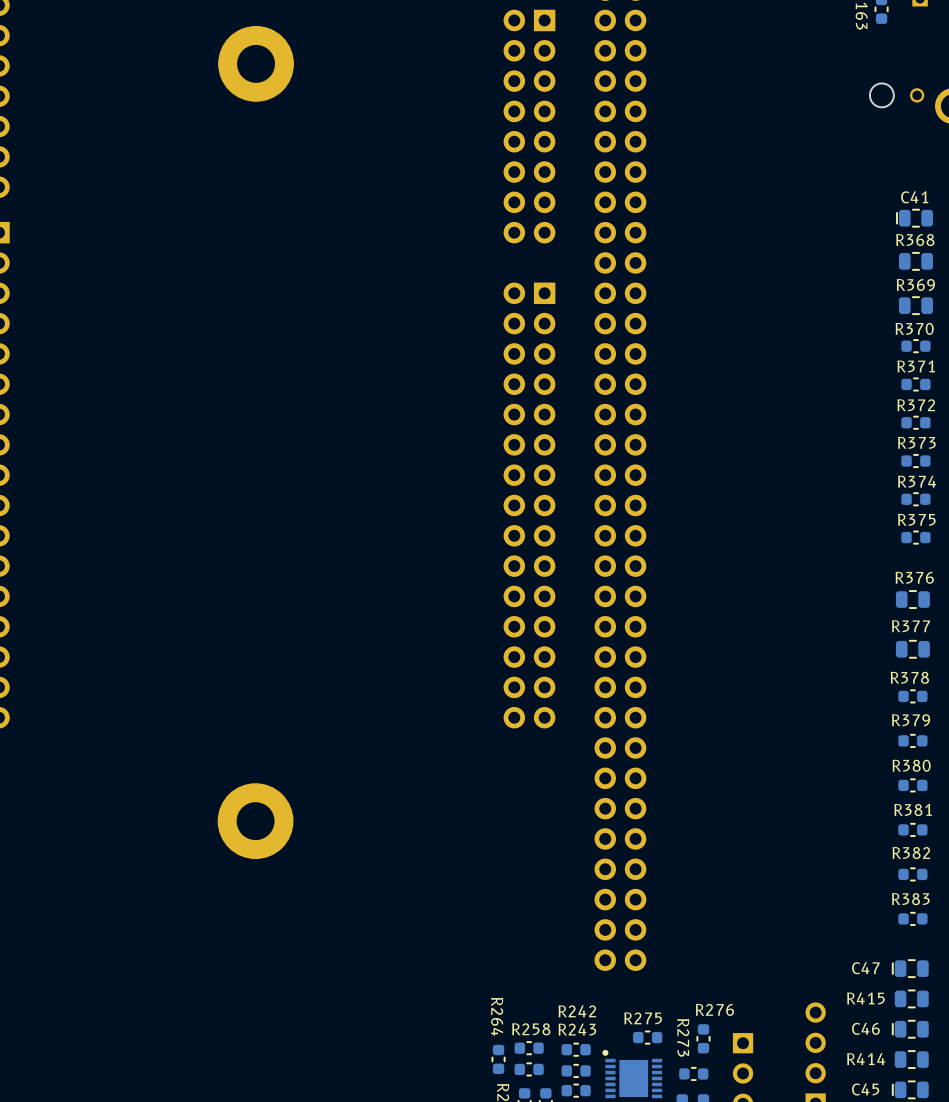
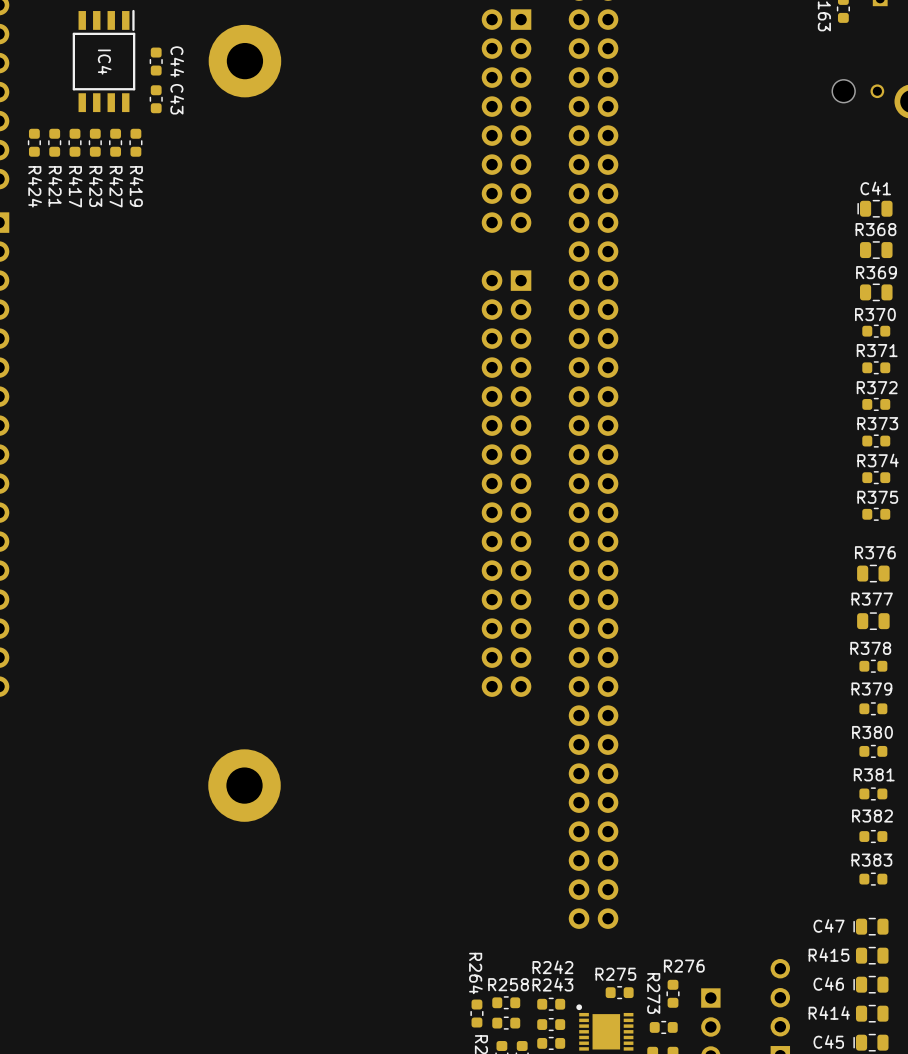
IC4: none -> (104, 60)
C44: none -> (156, 61)
C43: none -> (156, 99)
R424: none -> (34, 142)
R421: none -> (54, 142)
R417: none -> (75, 142)
R423: none -> (95, 142)
R427: none -> (115, 142)
R419: none -> (135, 142)

